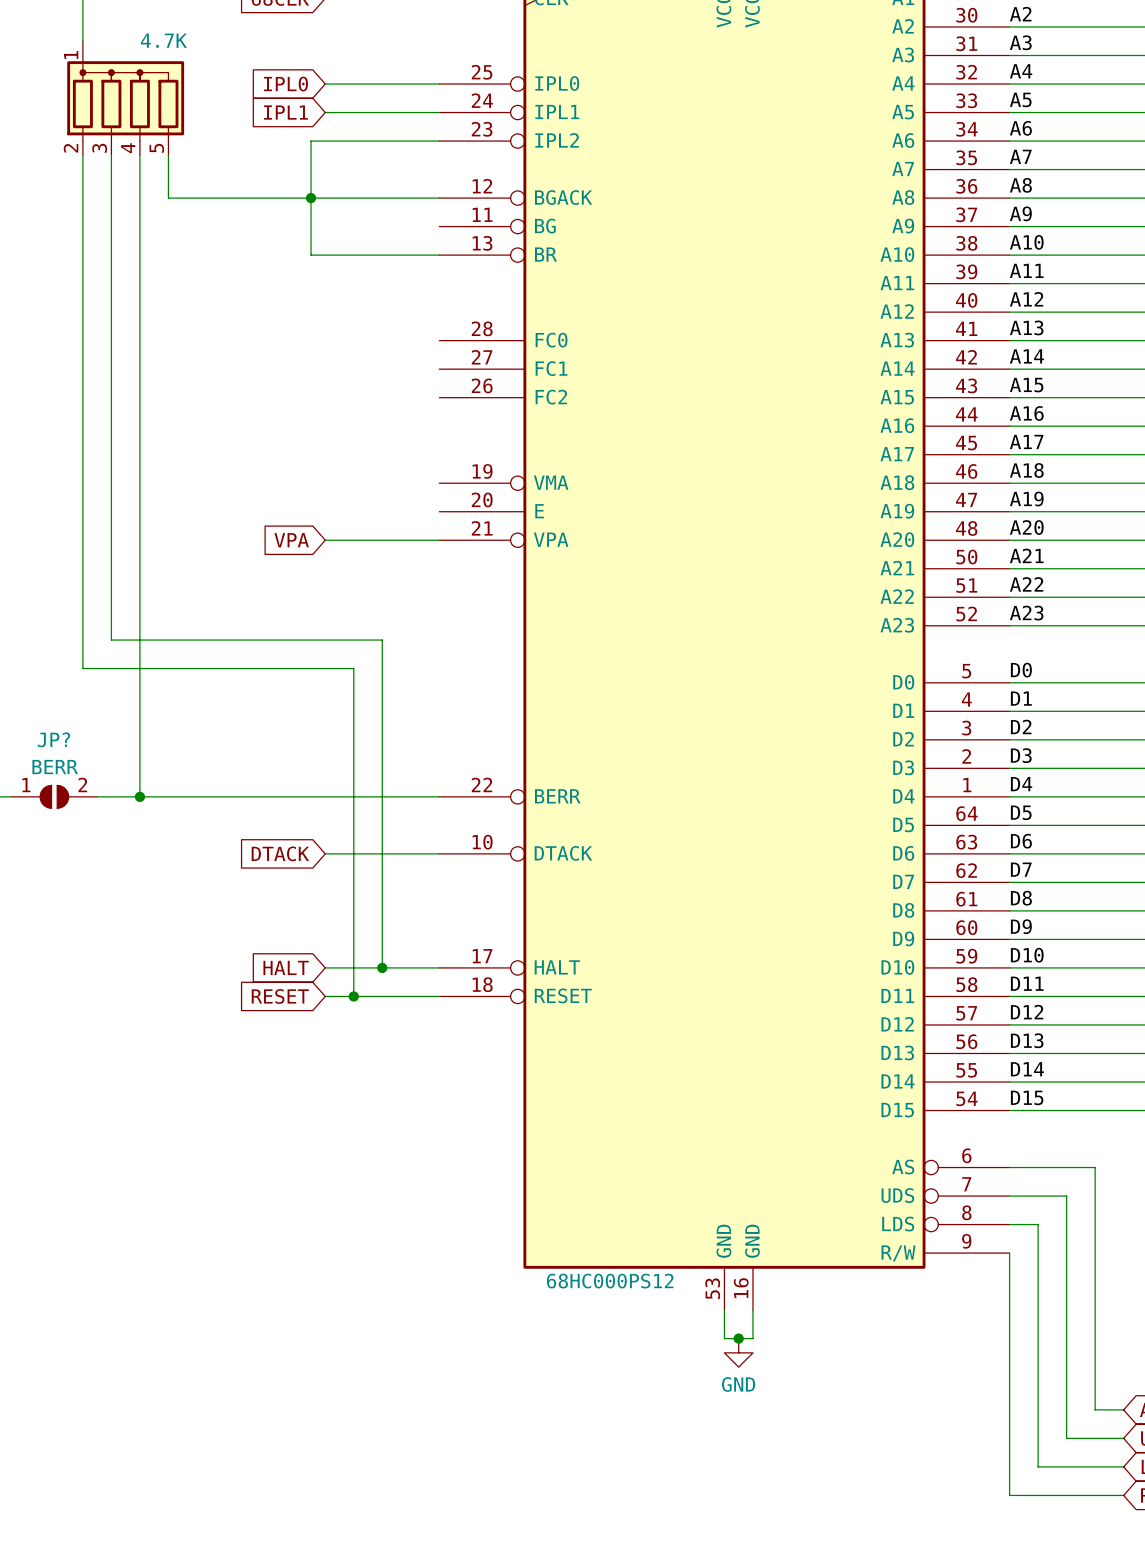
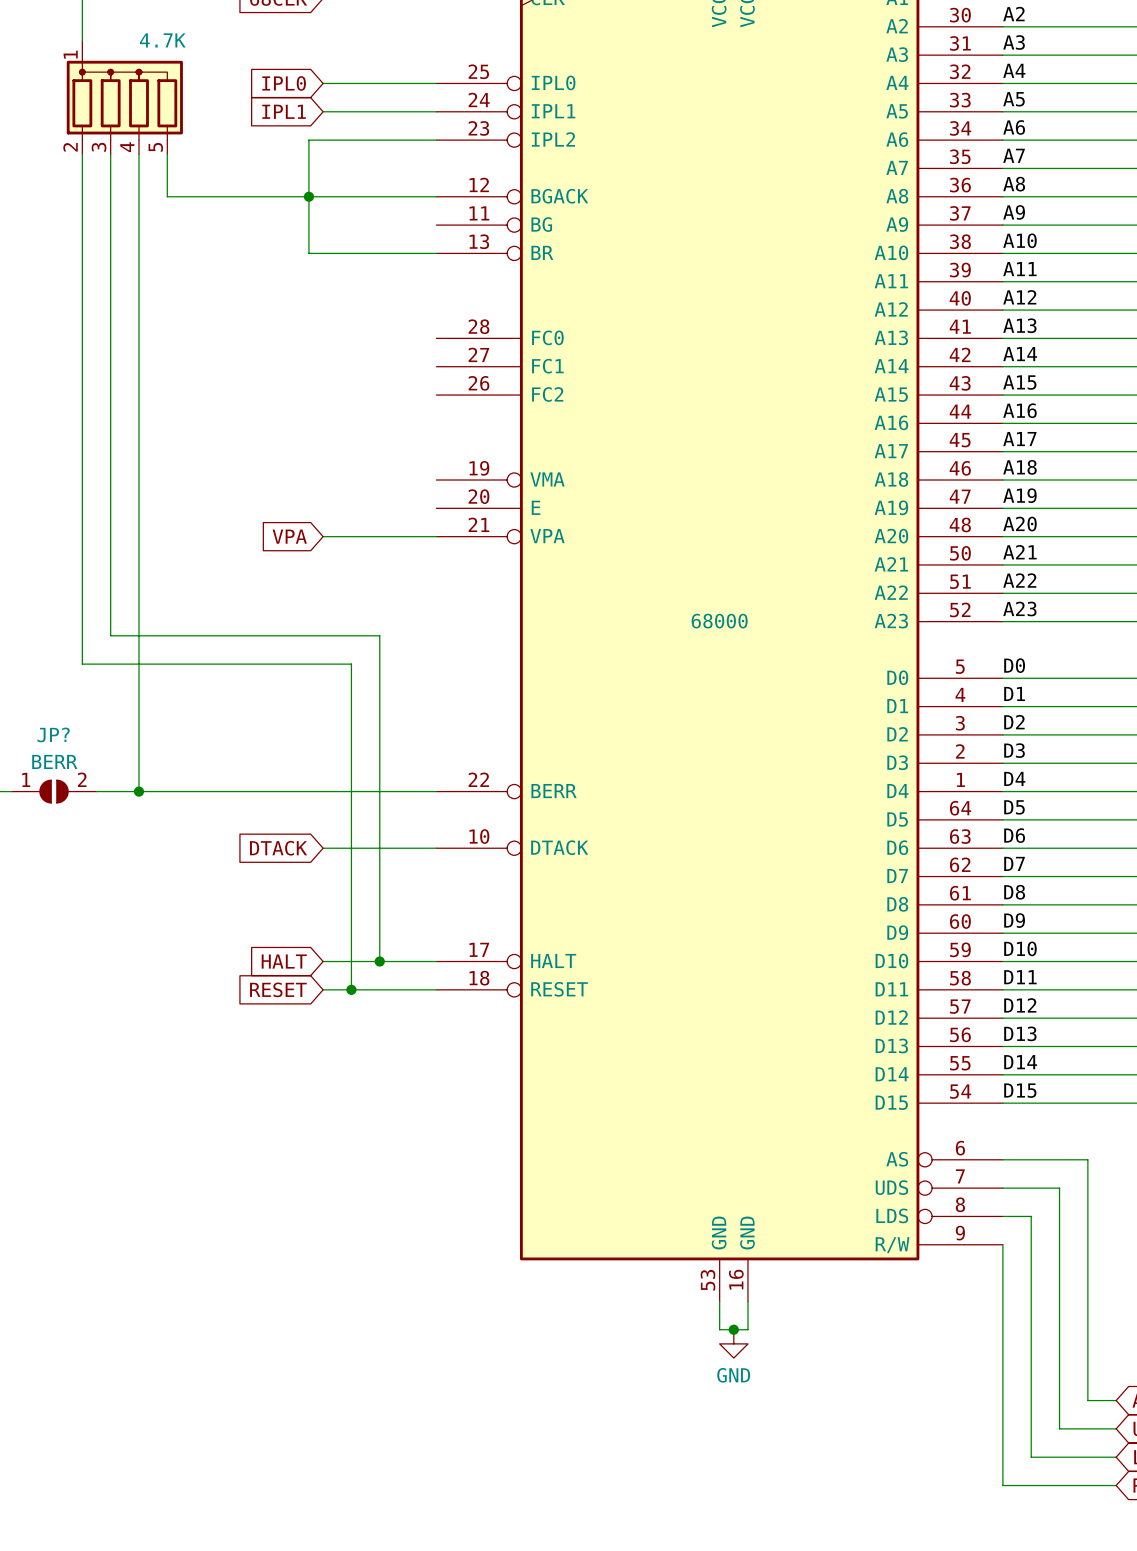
part value: 68HC000PS12 (610, 1281) -> 68000 (719, 621)

